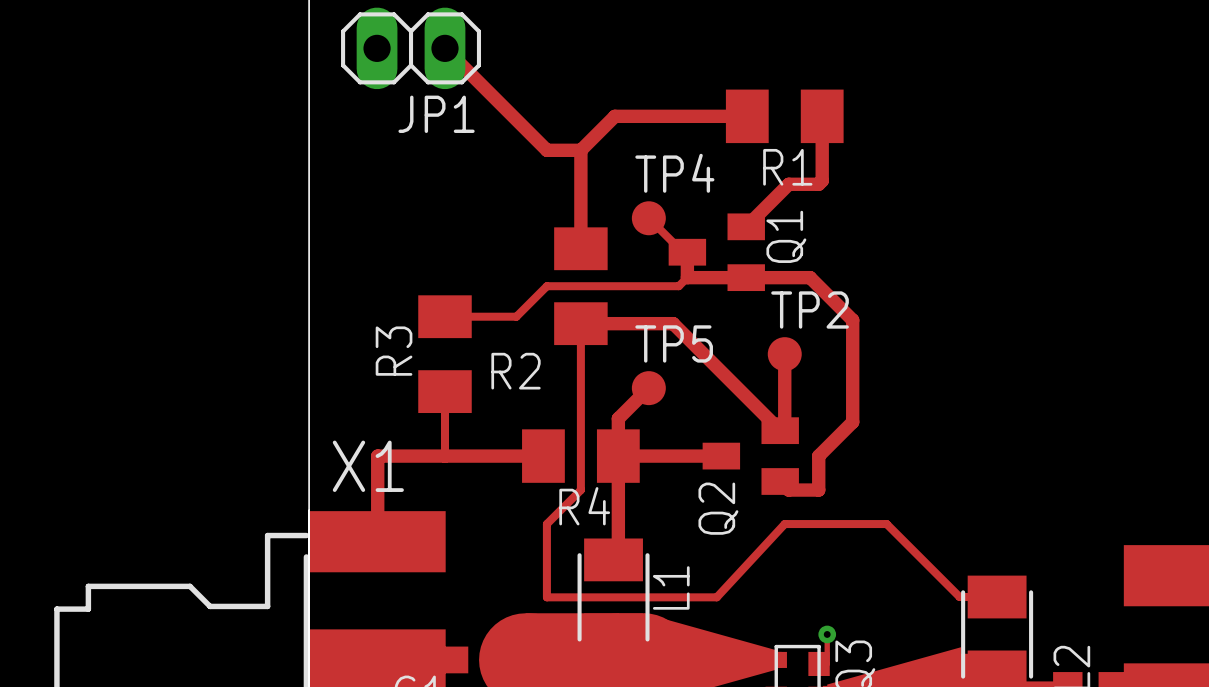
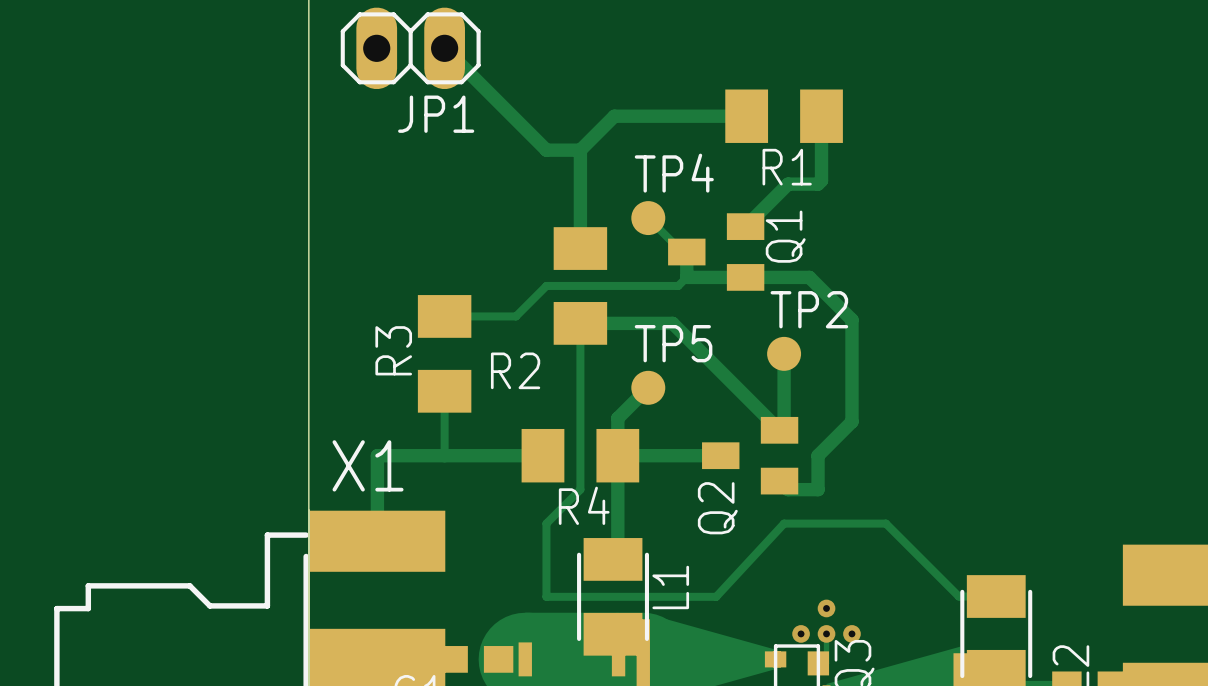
via: none -> (826, 608)
via: none -> (801, 633)
via: none -> (851, 633)

